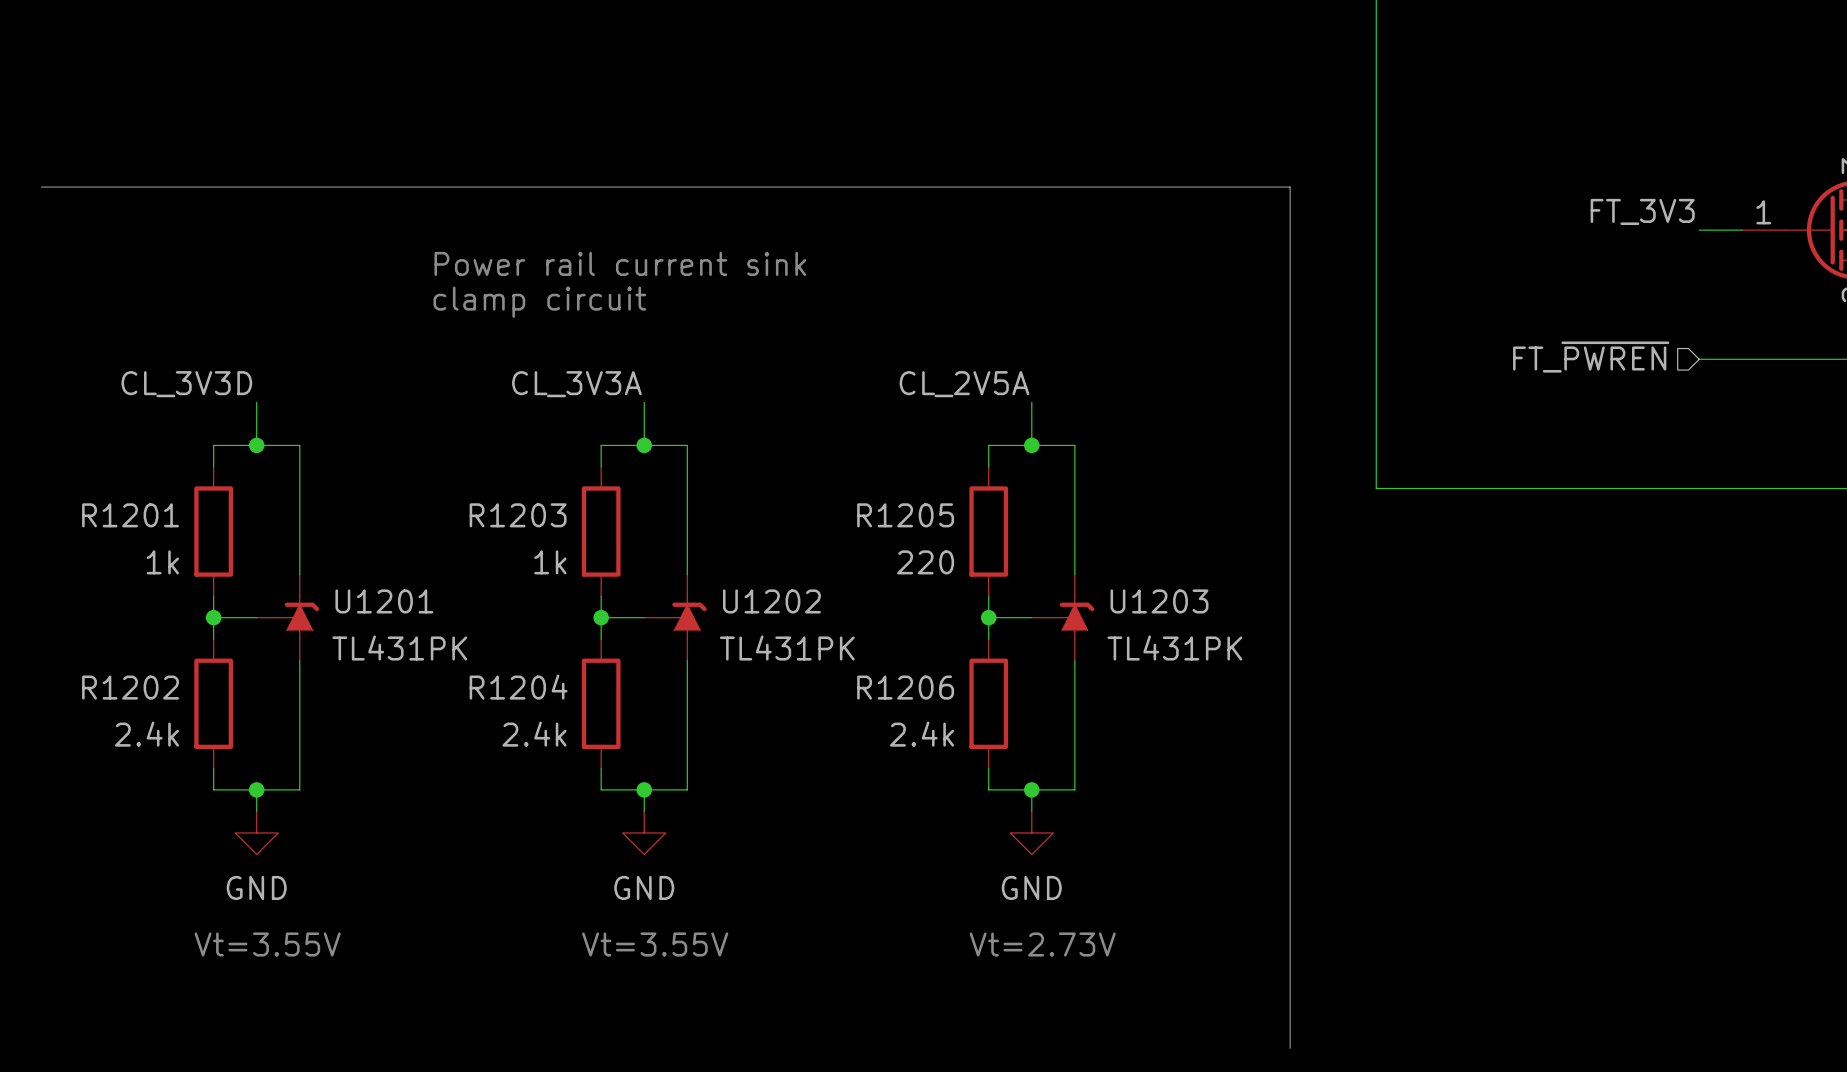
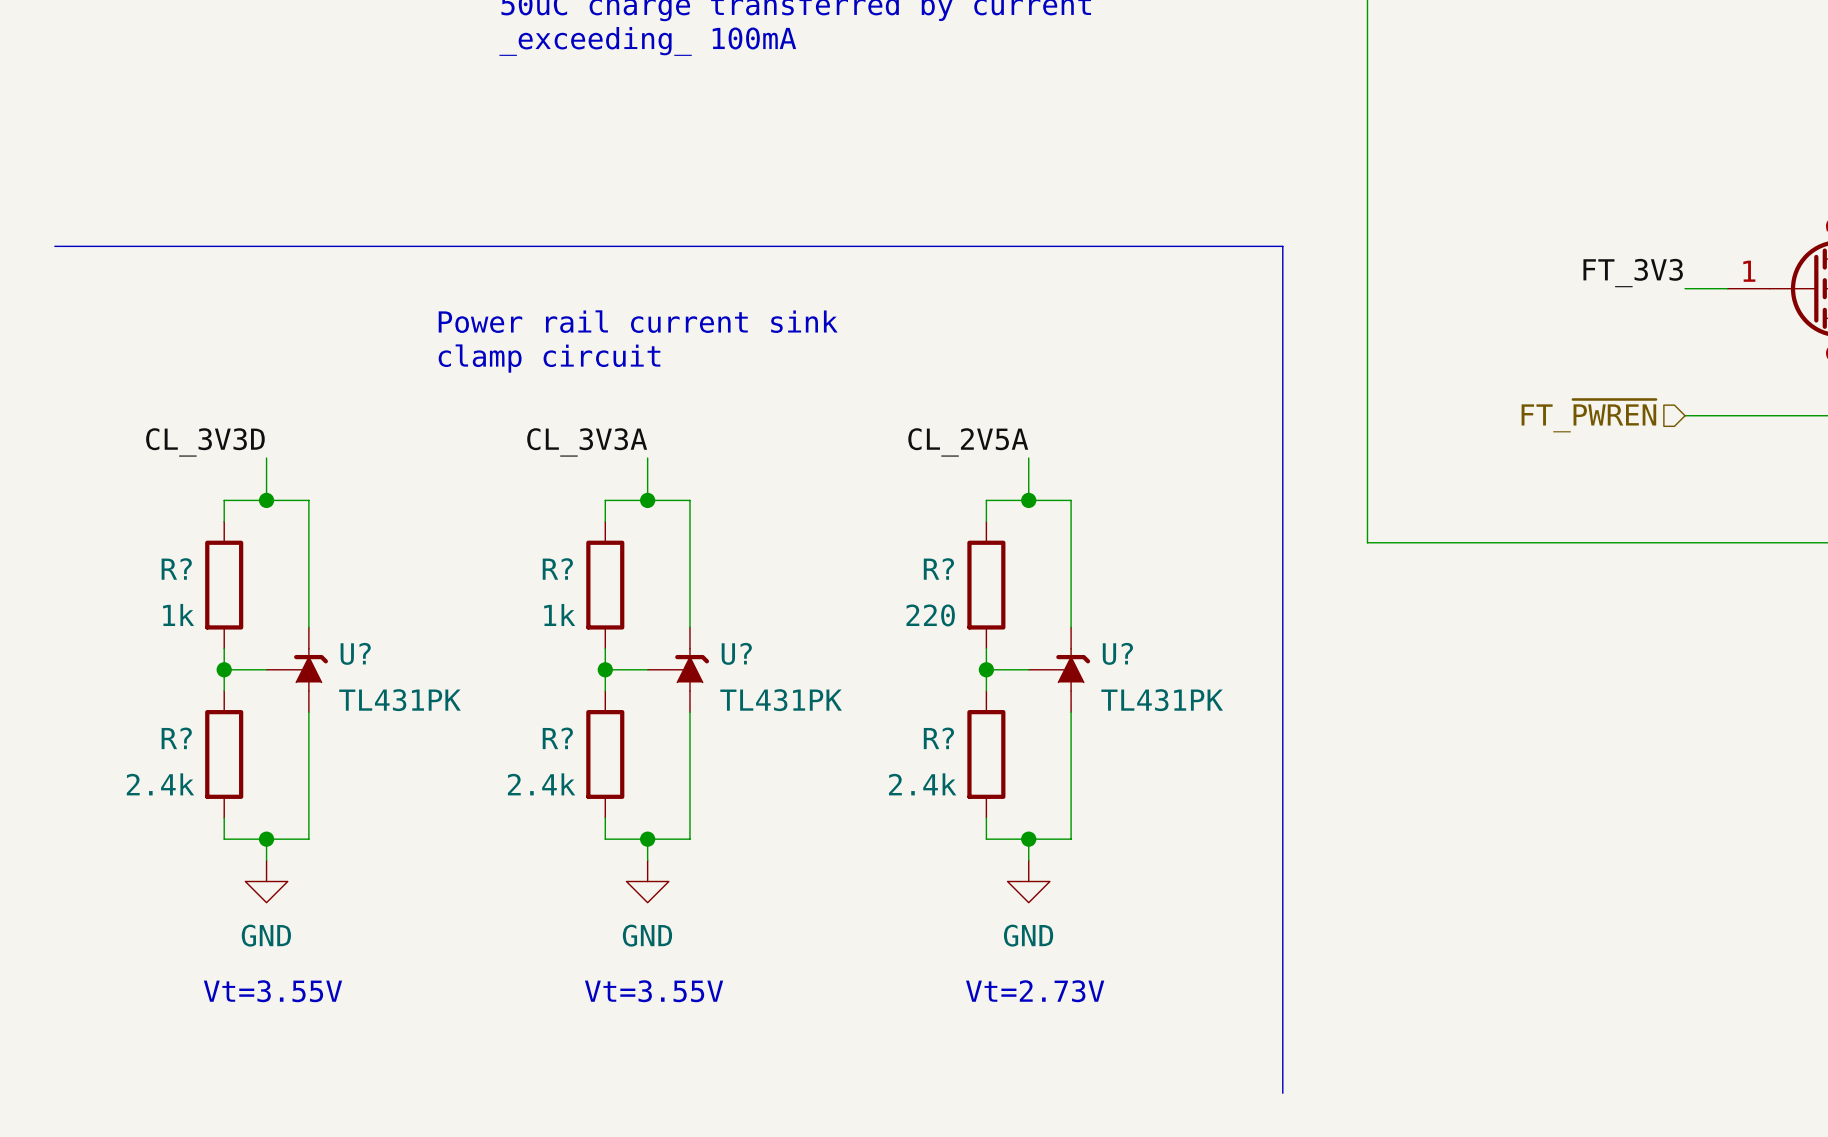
R1201 name: R1201 (130, 515) -> R? (176, 568)
R1203 name: R1203 (518, 515) -> R? (557, 568)
R1205 name: R1205 (905, 515) -> R? (938, 568)
U1201 name: U1201 (384, 601) -> U? (355, 653)
U1202 name: U1202 (771, 601) -> U? (736, 653)
U1203 name: U1203 (1159, 601) -> U? (1117, 653)
R1202 name: R1202 (130, 687) -> R? (176, 738)
R1204 name: R1204 (518, 687) -> R? (557, 738)
R1206 name: R1206 (905, 687) -> R? (938, 738)

